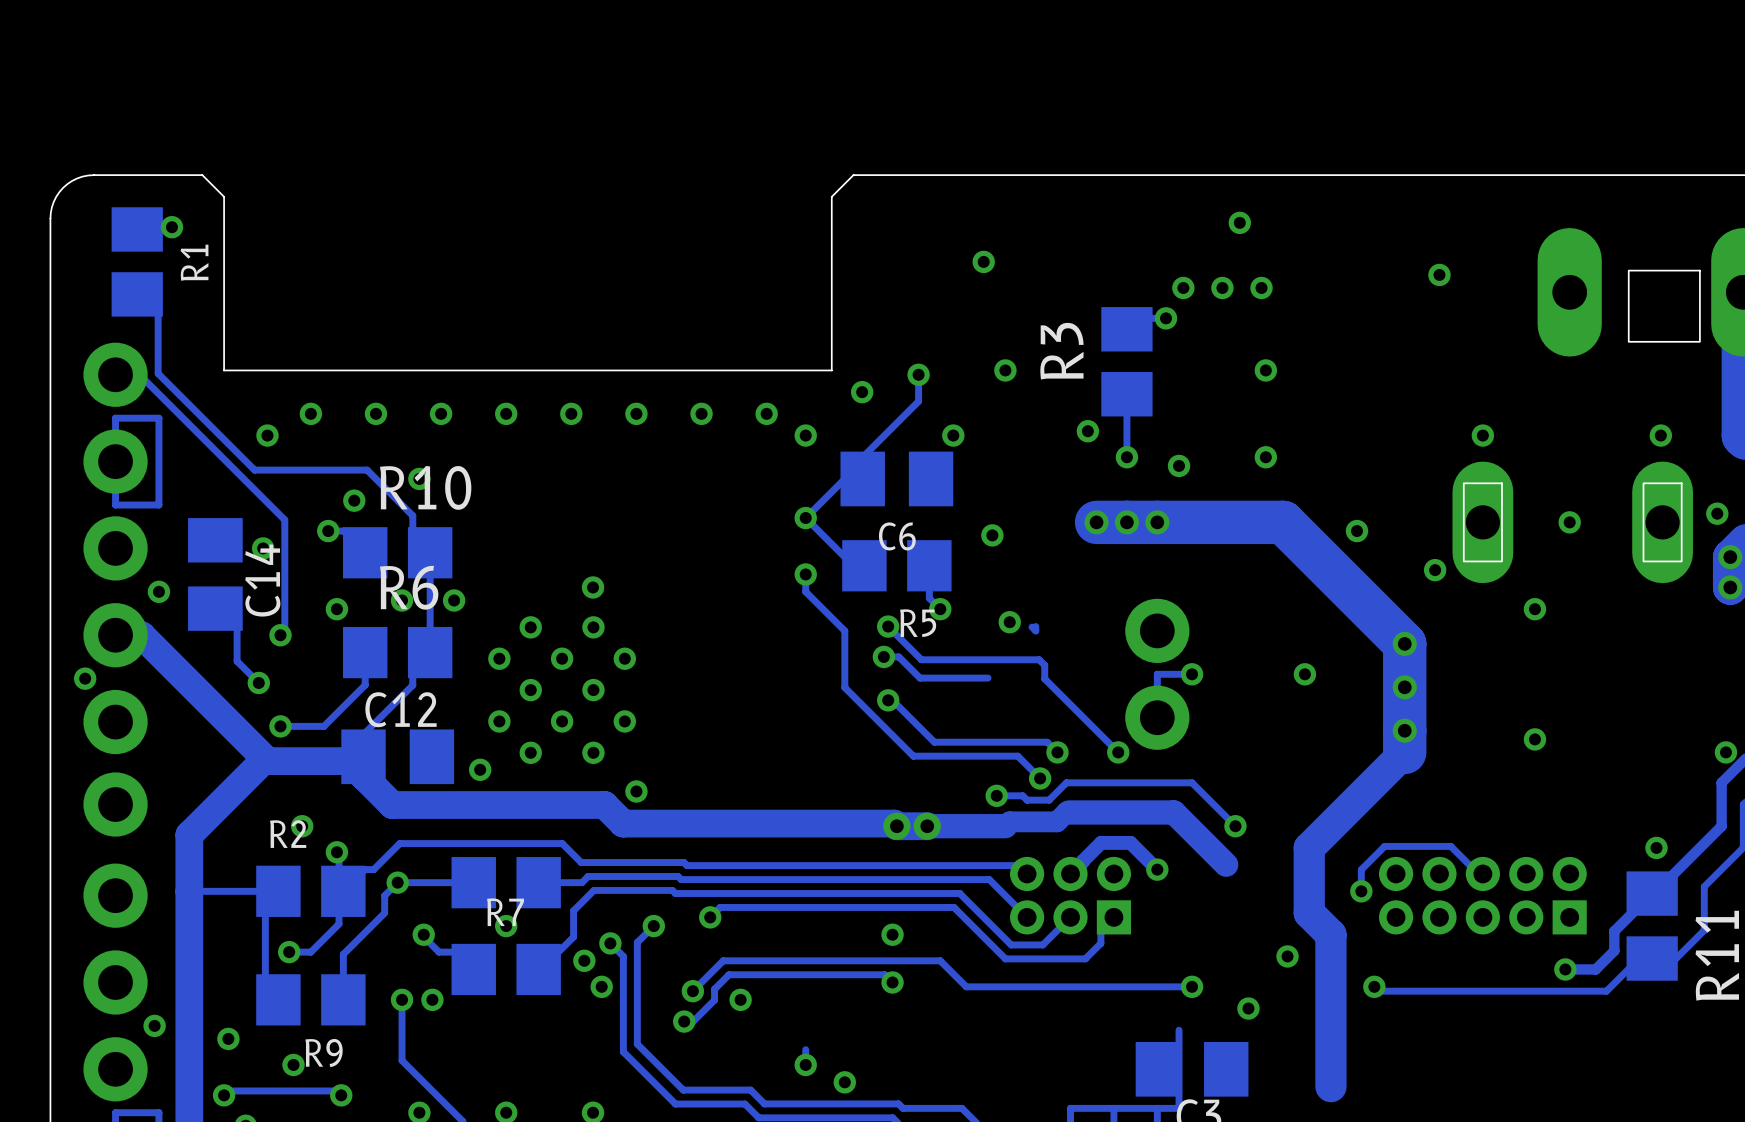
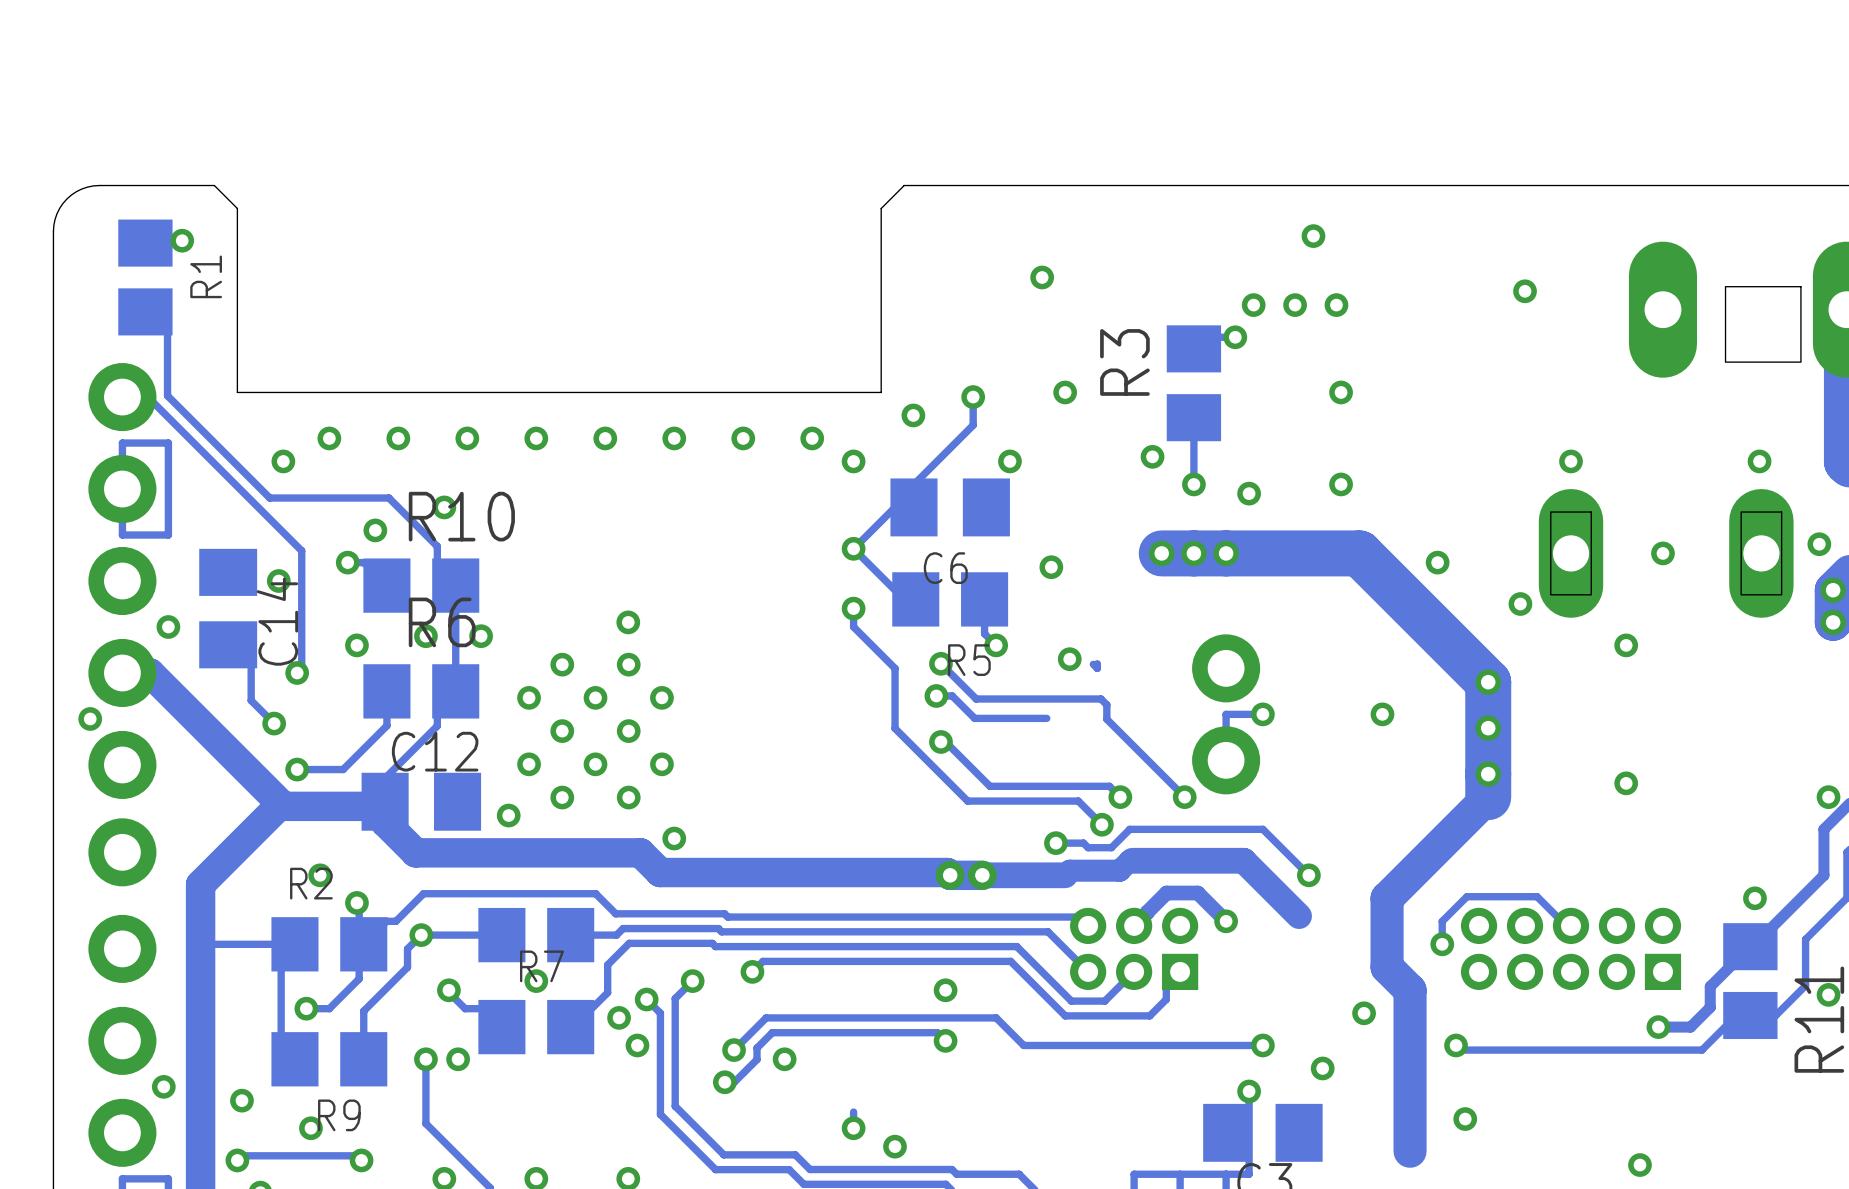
via: none -> (1828, 994)
via: none -> (1249, 1091)
via: none -> (1465, 1119)
via: none -> (1639, 1165)

